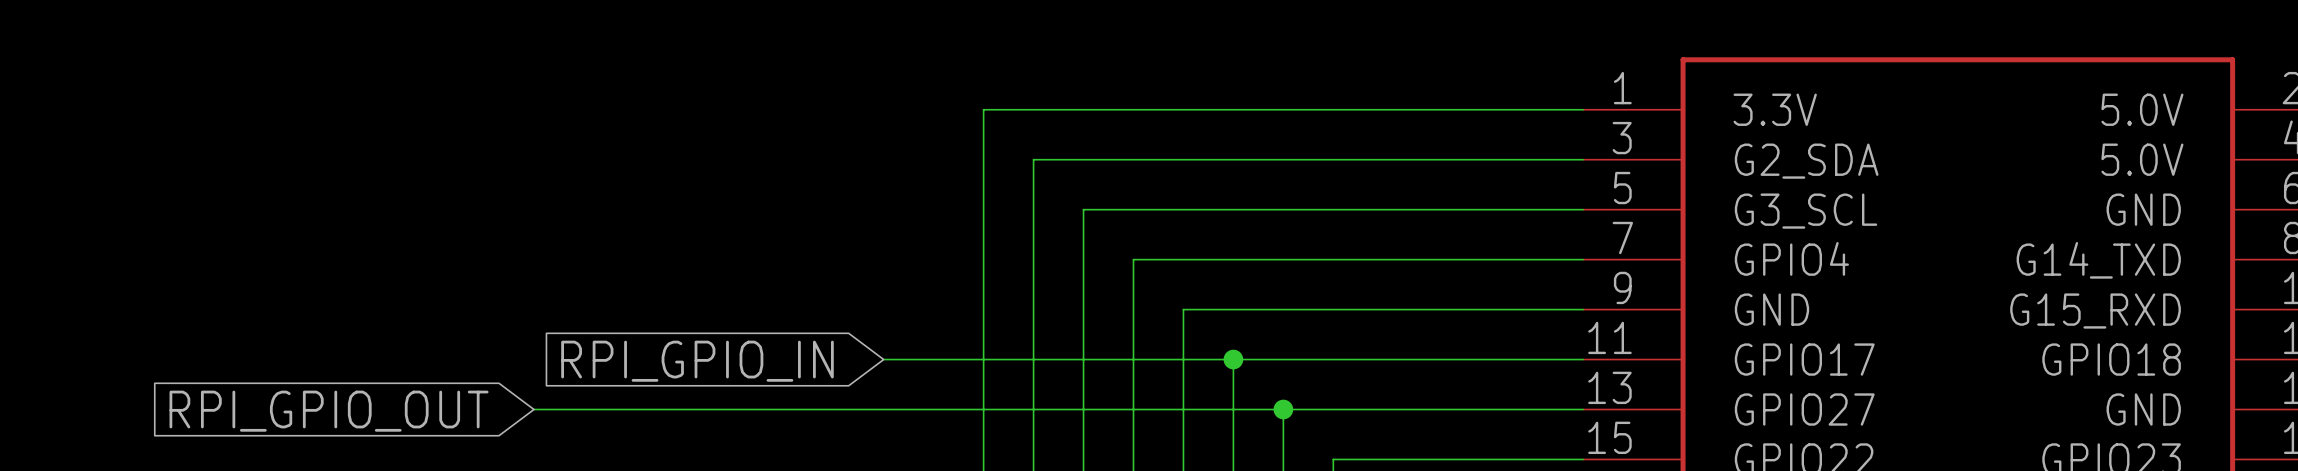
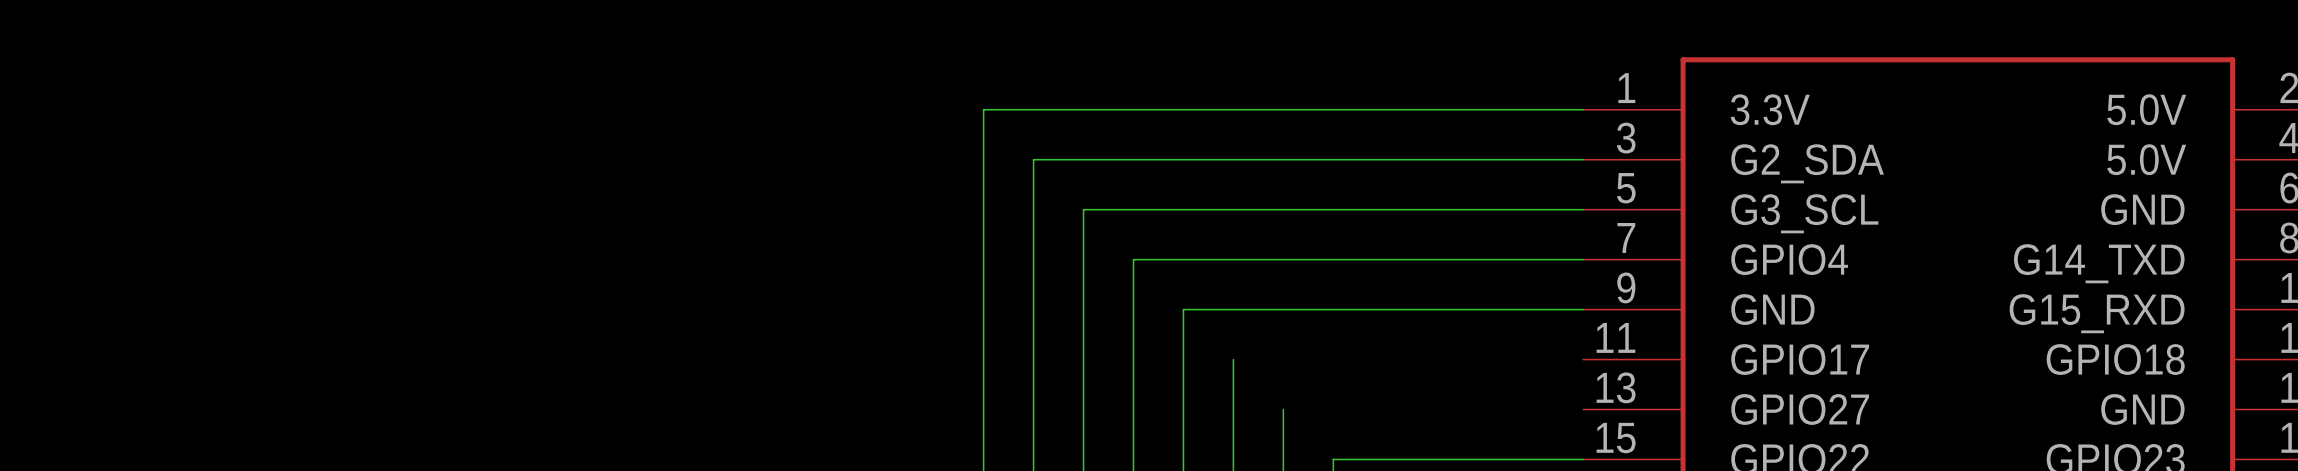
wire: (883, 359) (1583, 359) -> none
junction: (1233, 359) -> none
global label: RPI_GPIO_IN (697, 361) -> none
wire: (533, 409) (1583, 409) -> none
junction: (1283, 409) -> none
global label: RPI_GPIO_OUT (329, 411) -> none

